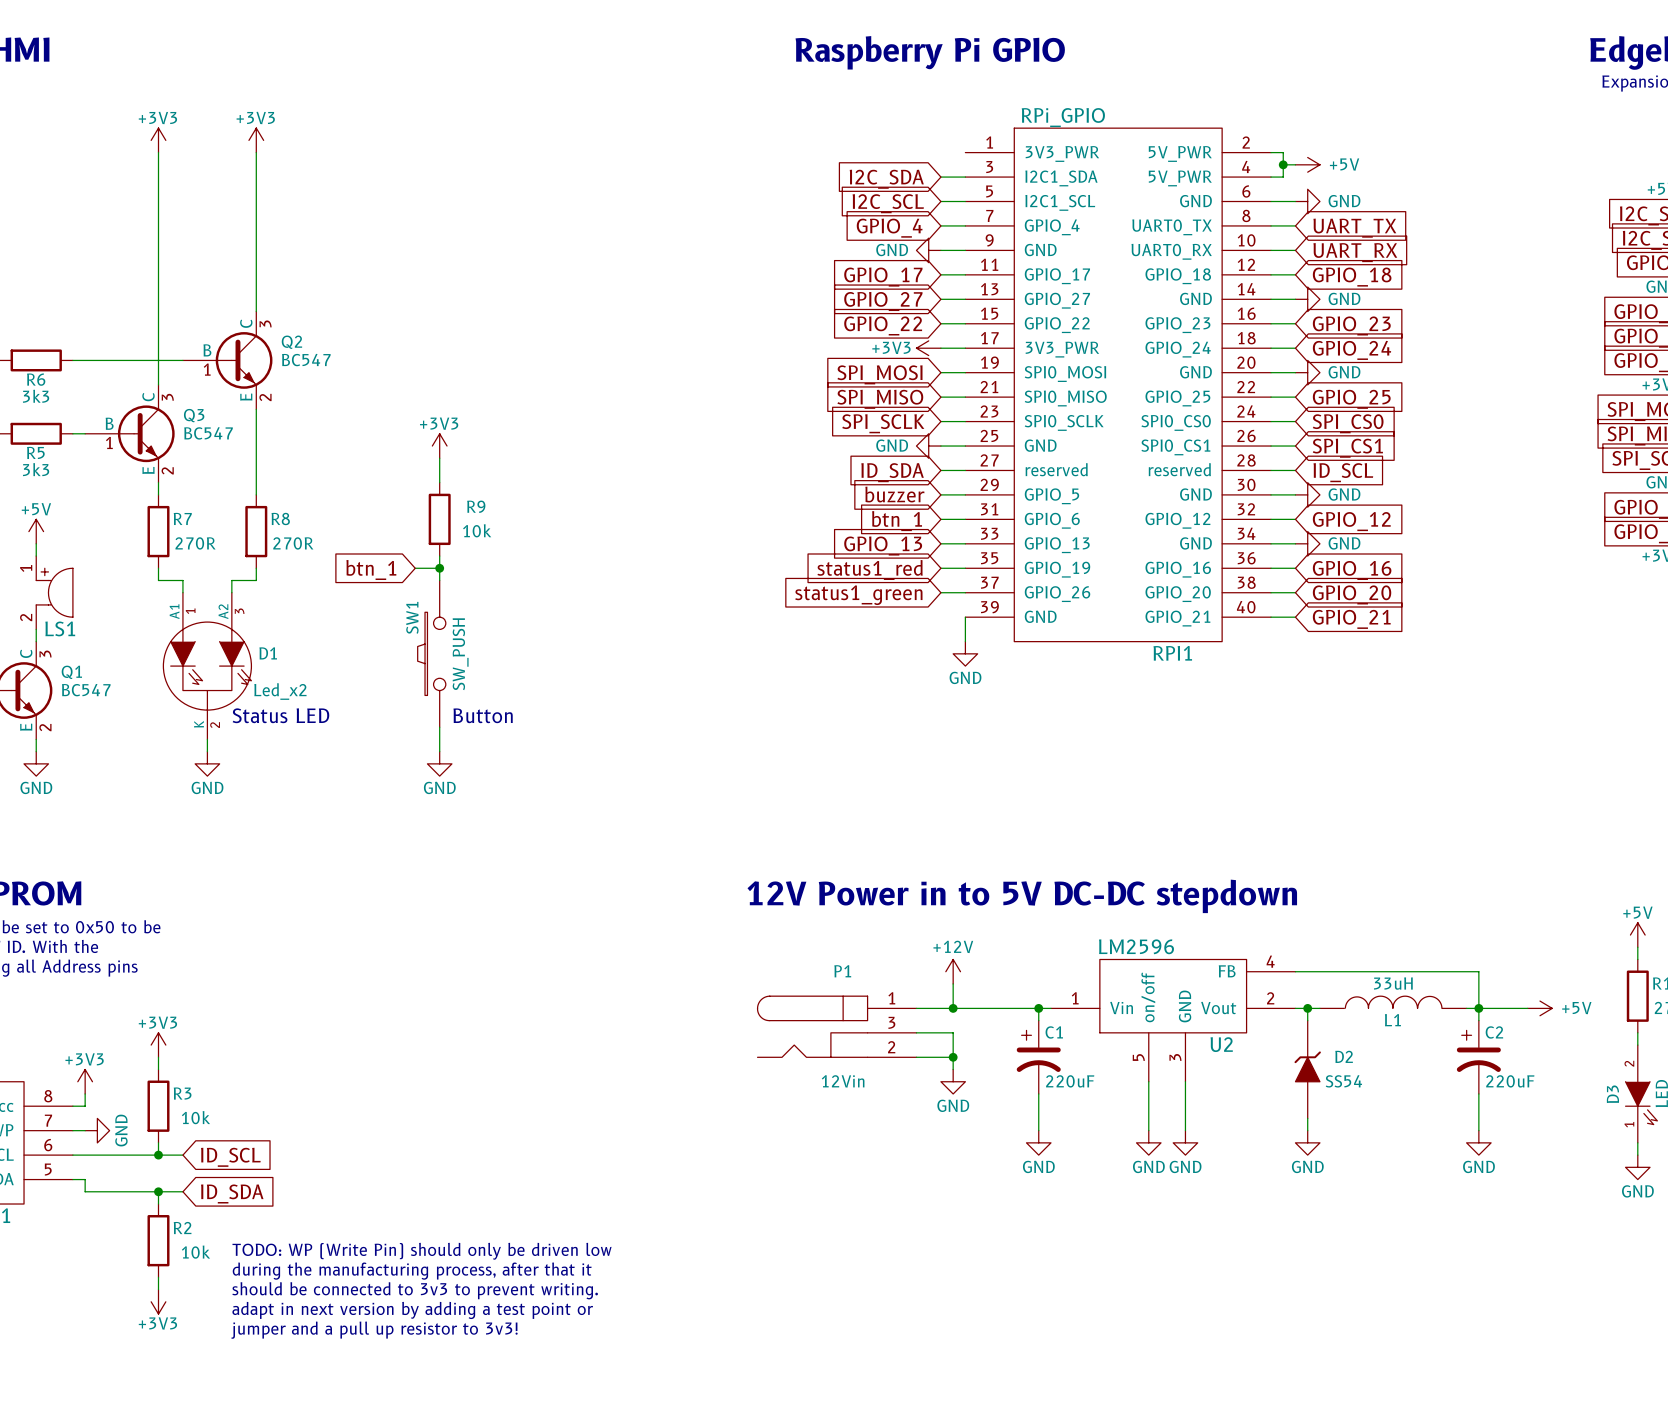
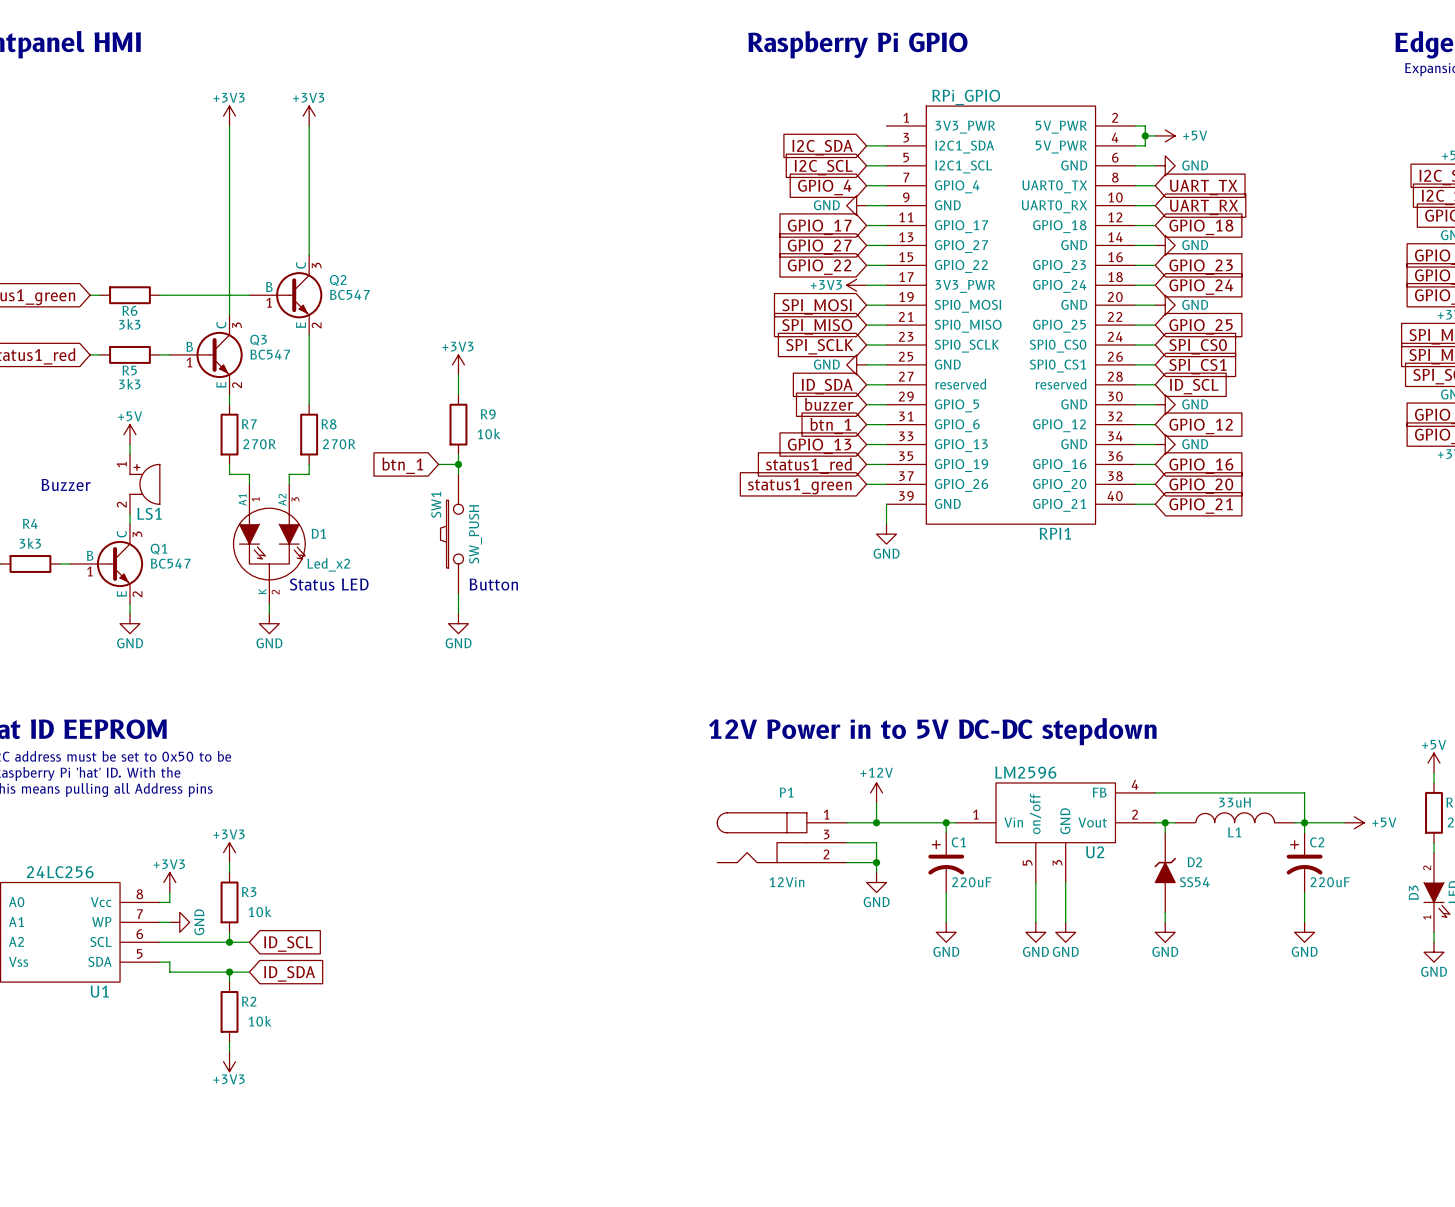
text: TODO: WP (Write Pin) should only be driven low (422, 1251) -> none
text: during the manufacturing process, after that it (412, 1271) -> none
text: should be connected to 3v3 to prevent writing. (415, 1290) -> none
text: adapt in next version by adding a test point or (412, 1310) -> none
text: jumper and a pull up resistor to 3v3! (374, 1330) -> none

